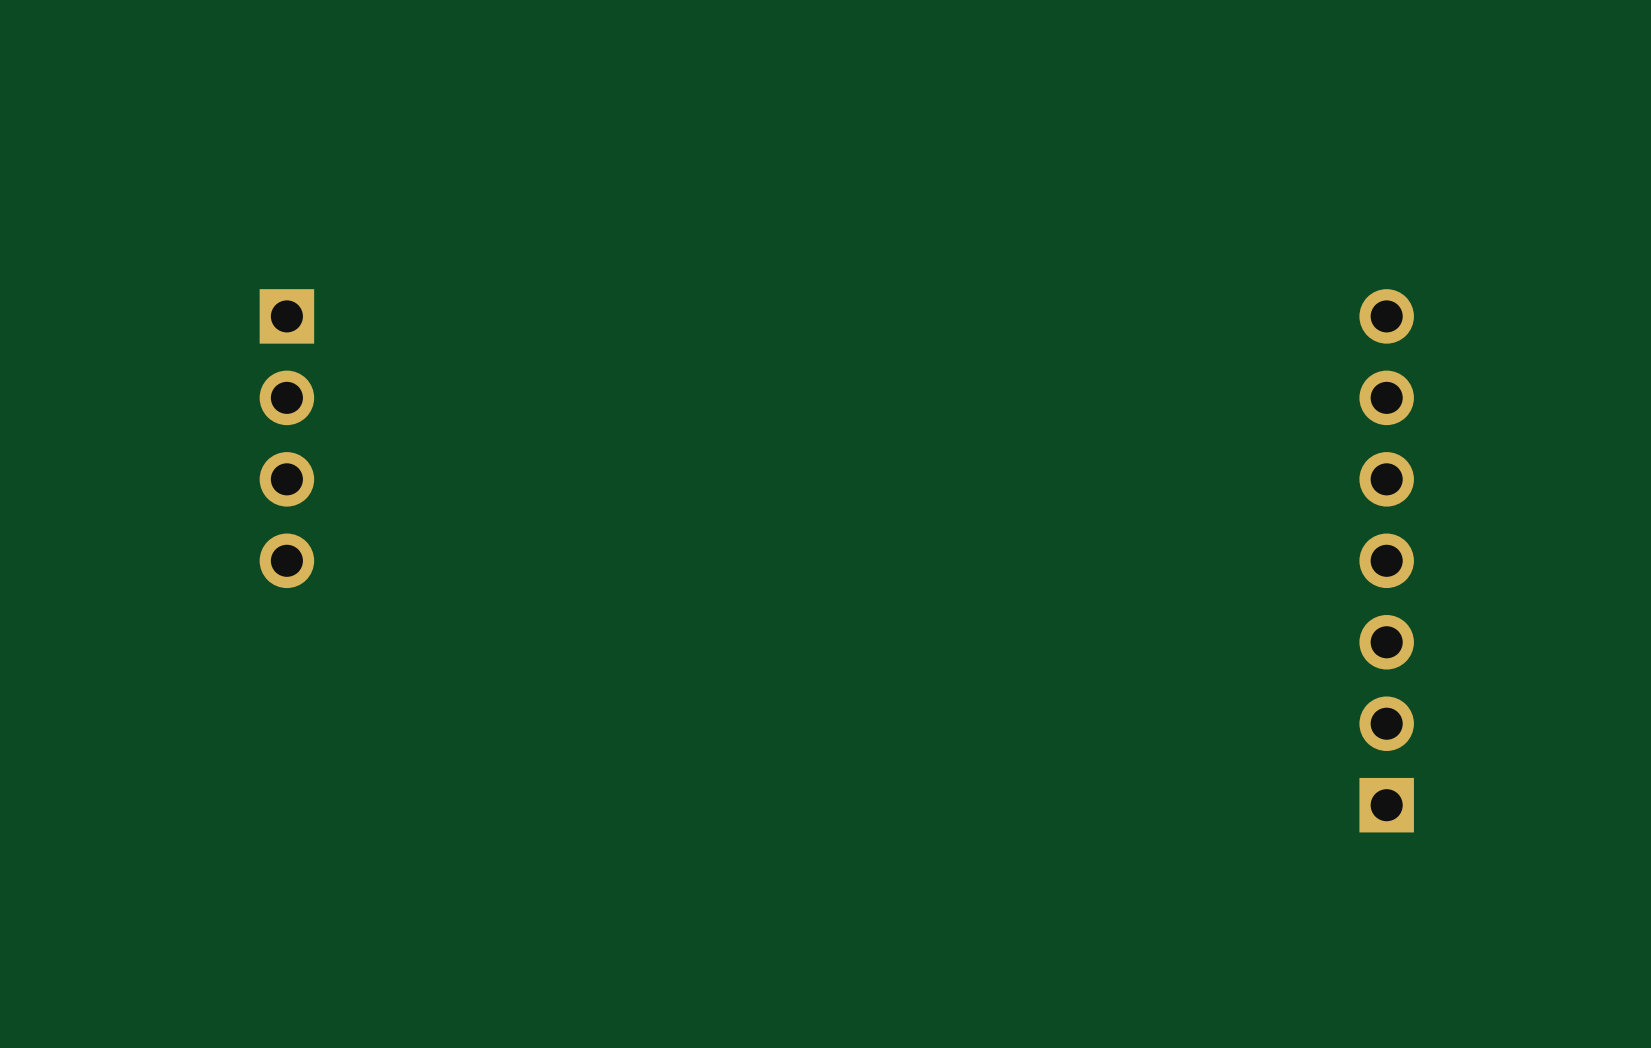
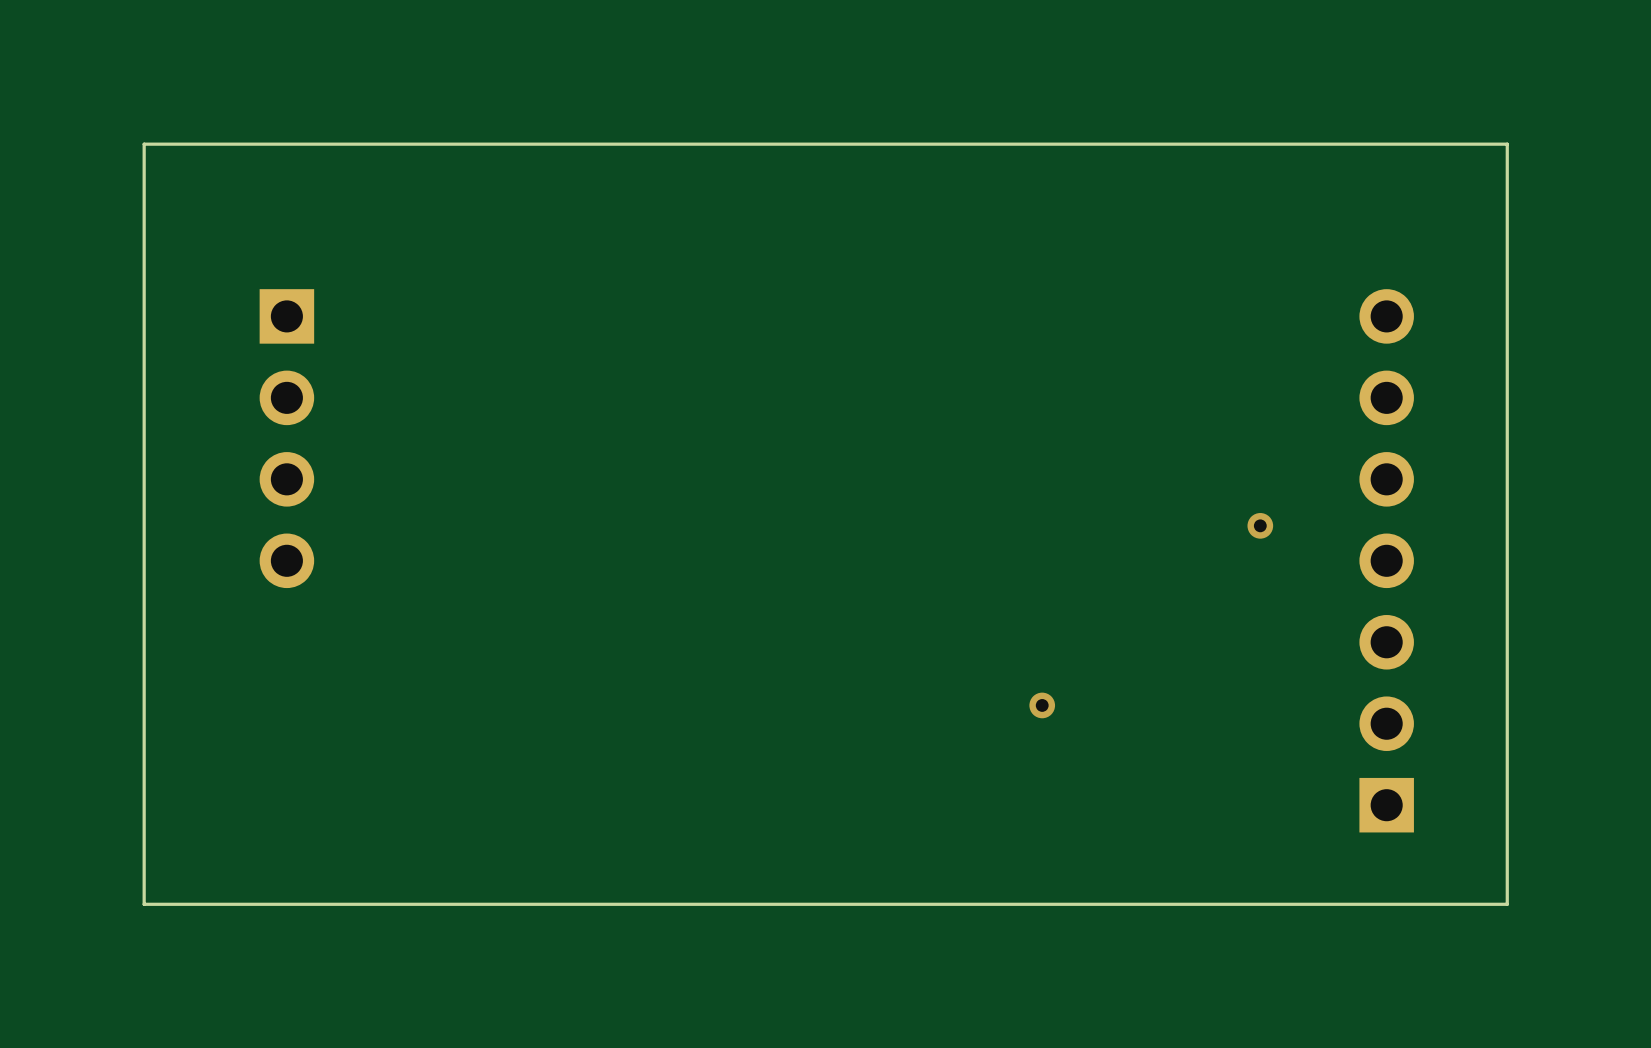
board edge: none -> (1507, 144) (144, 144) (144, 904) (1507, 904) (1507, 144)
via: none -> (1260, 525)
via: none -> (1042, 705)

